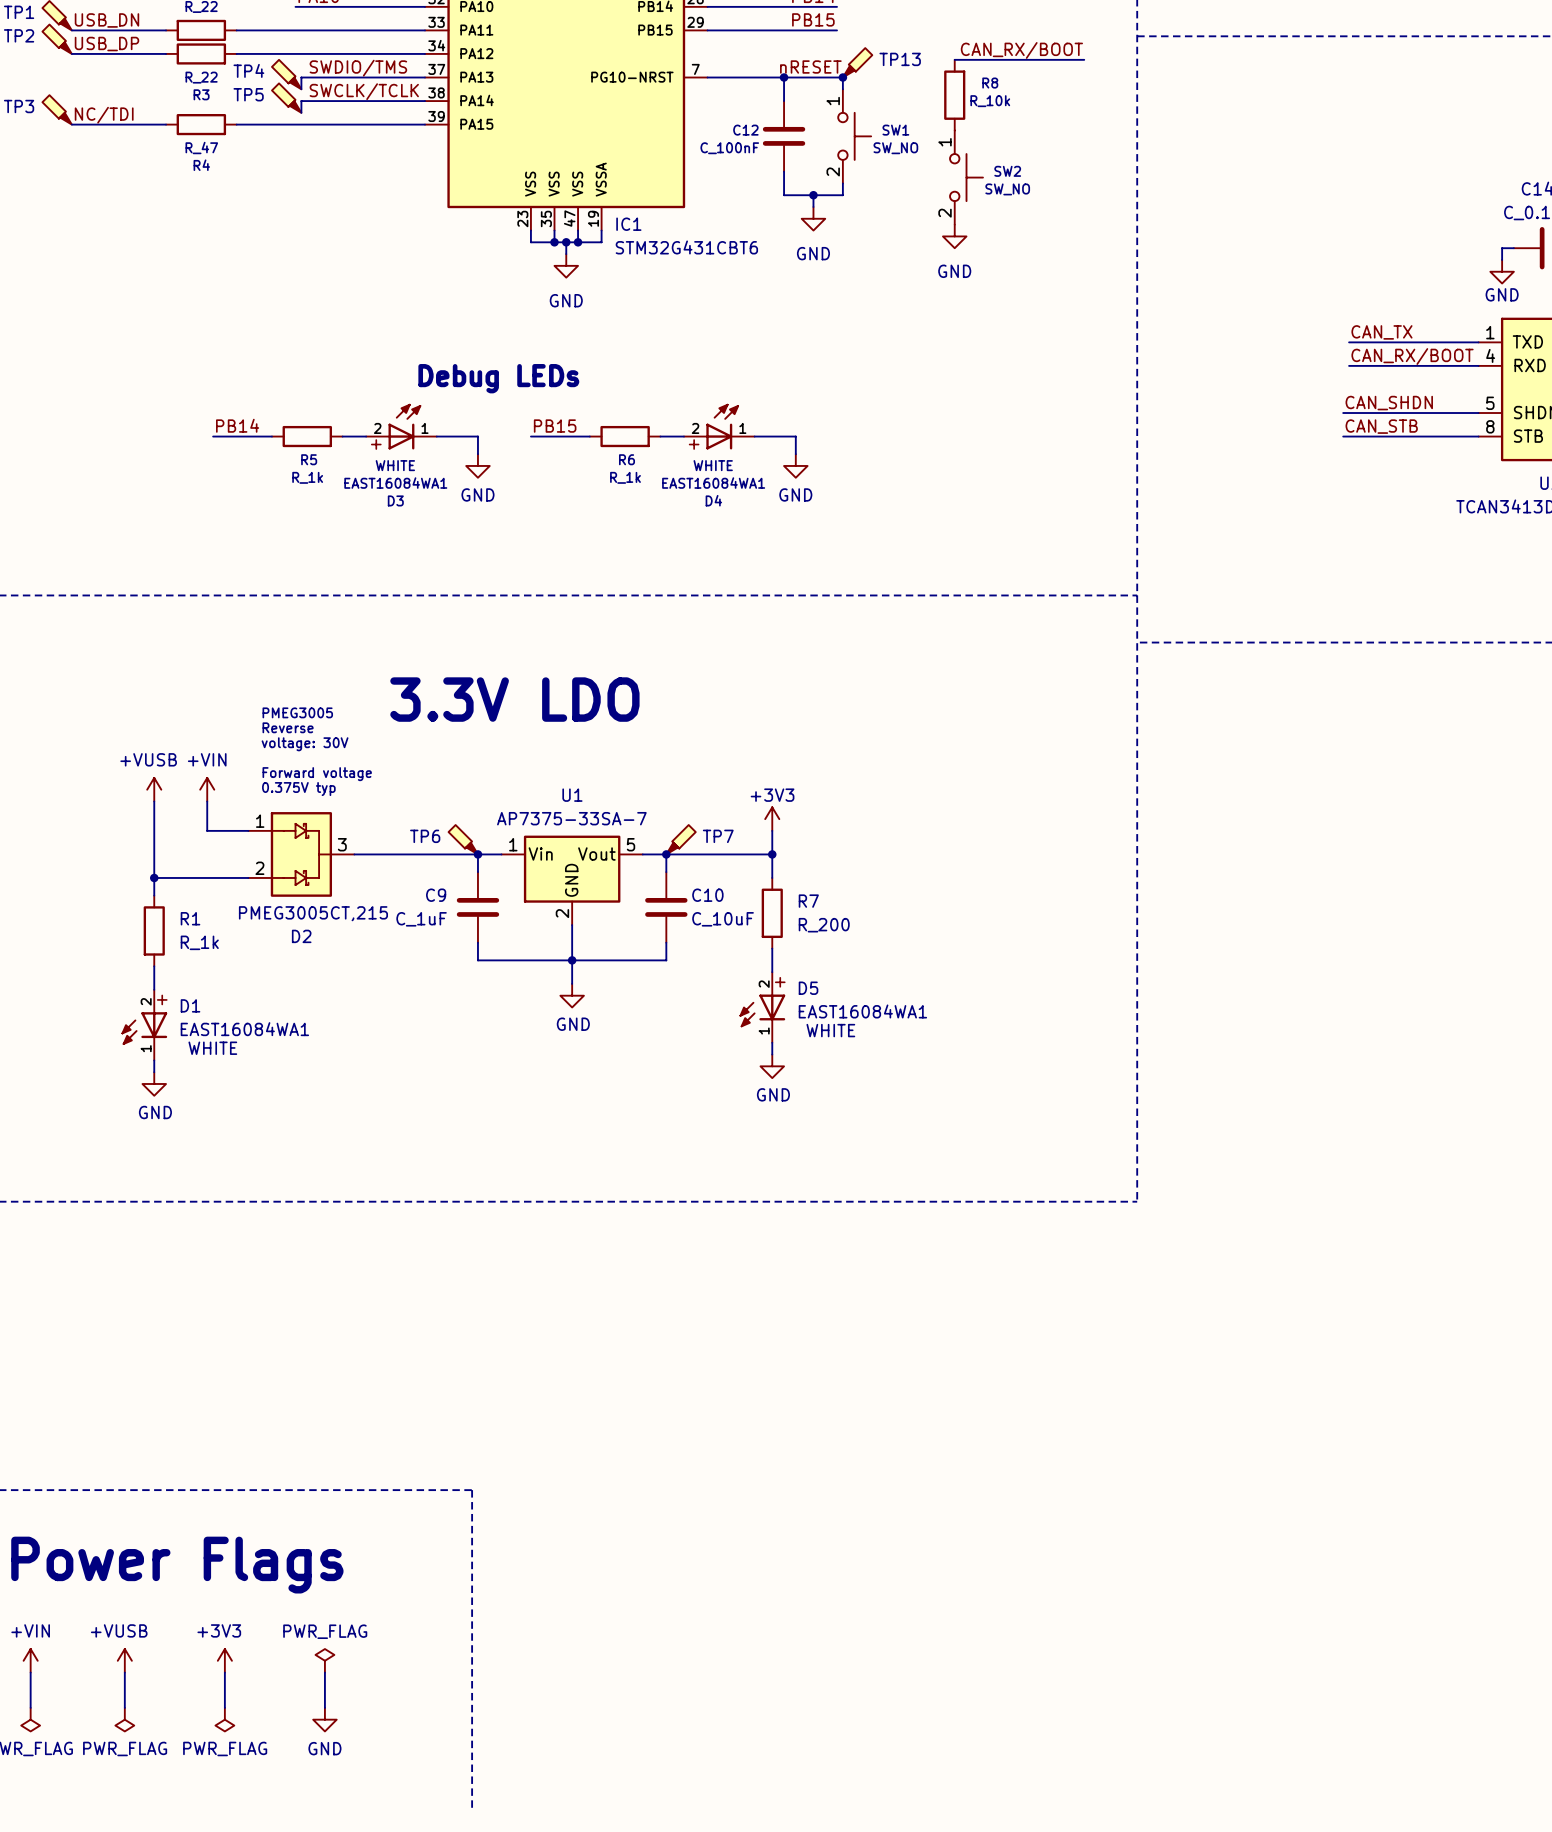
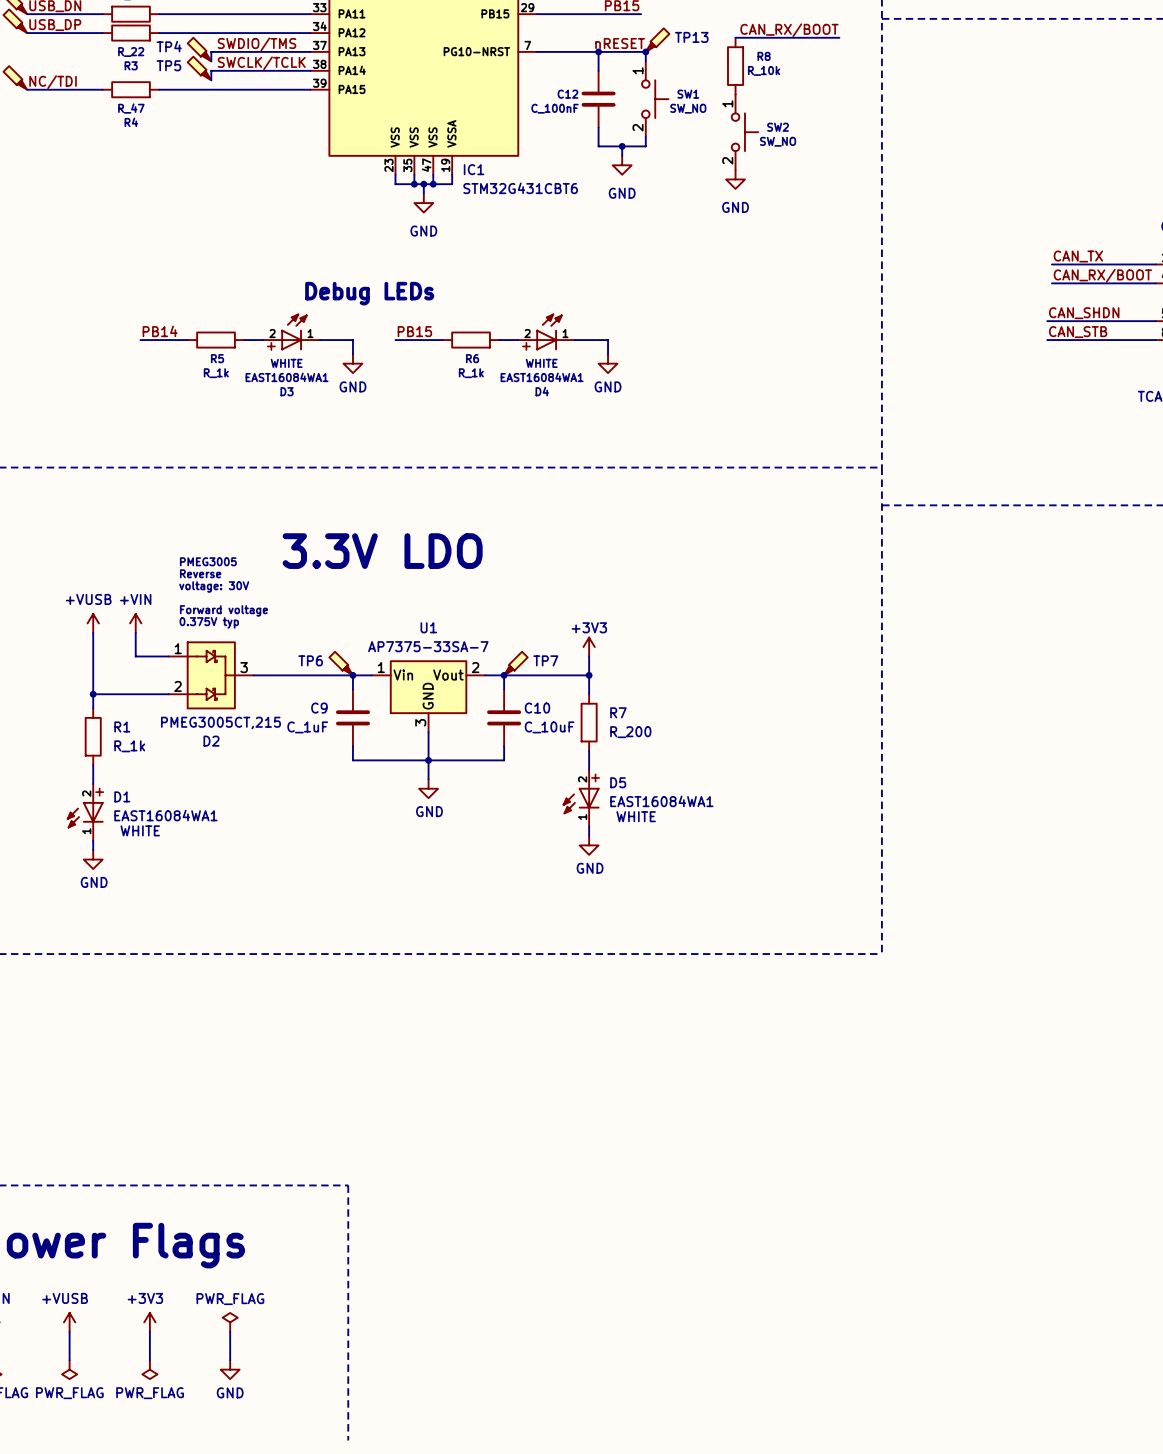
U1 pin number: 5 (631, 844) -> 2 (475, 667)
U1 pin number: 2 (562, 913) -> 3 (420, 722)

